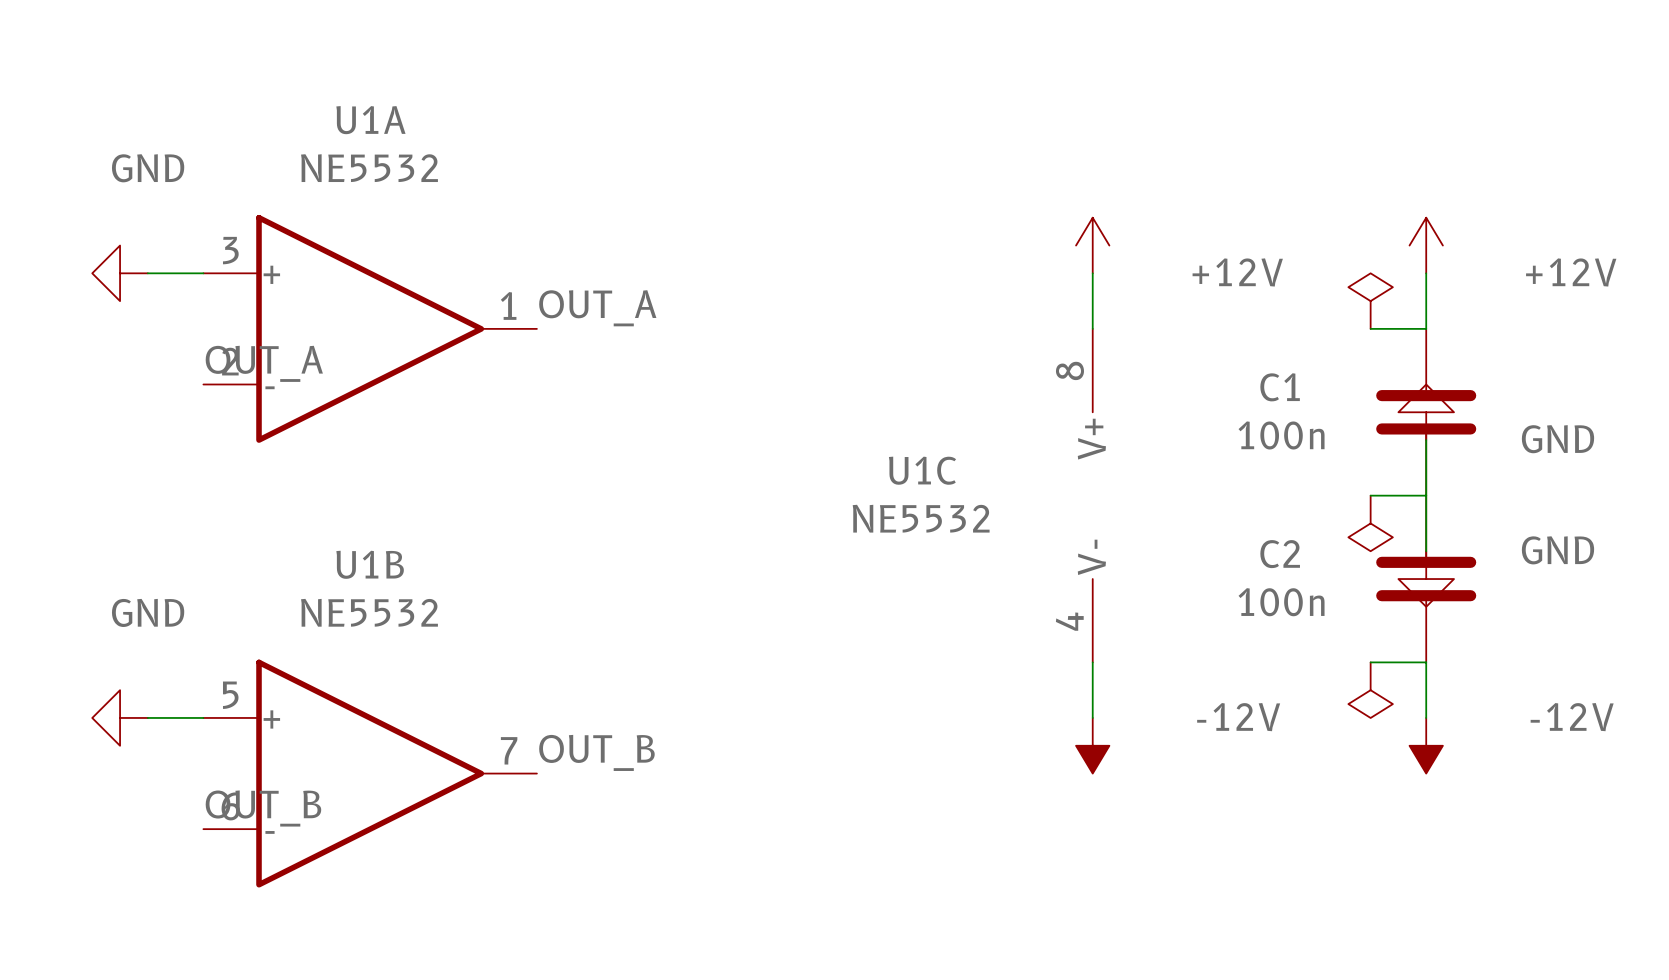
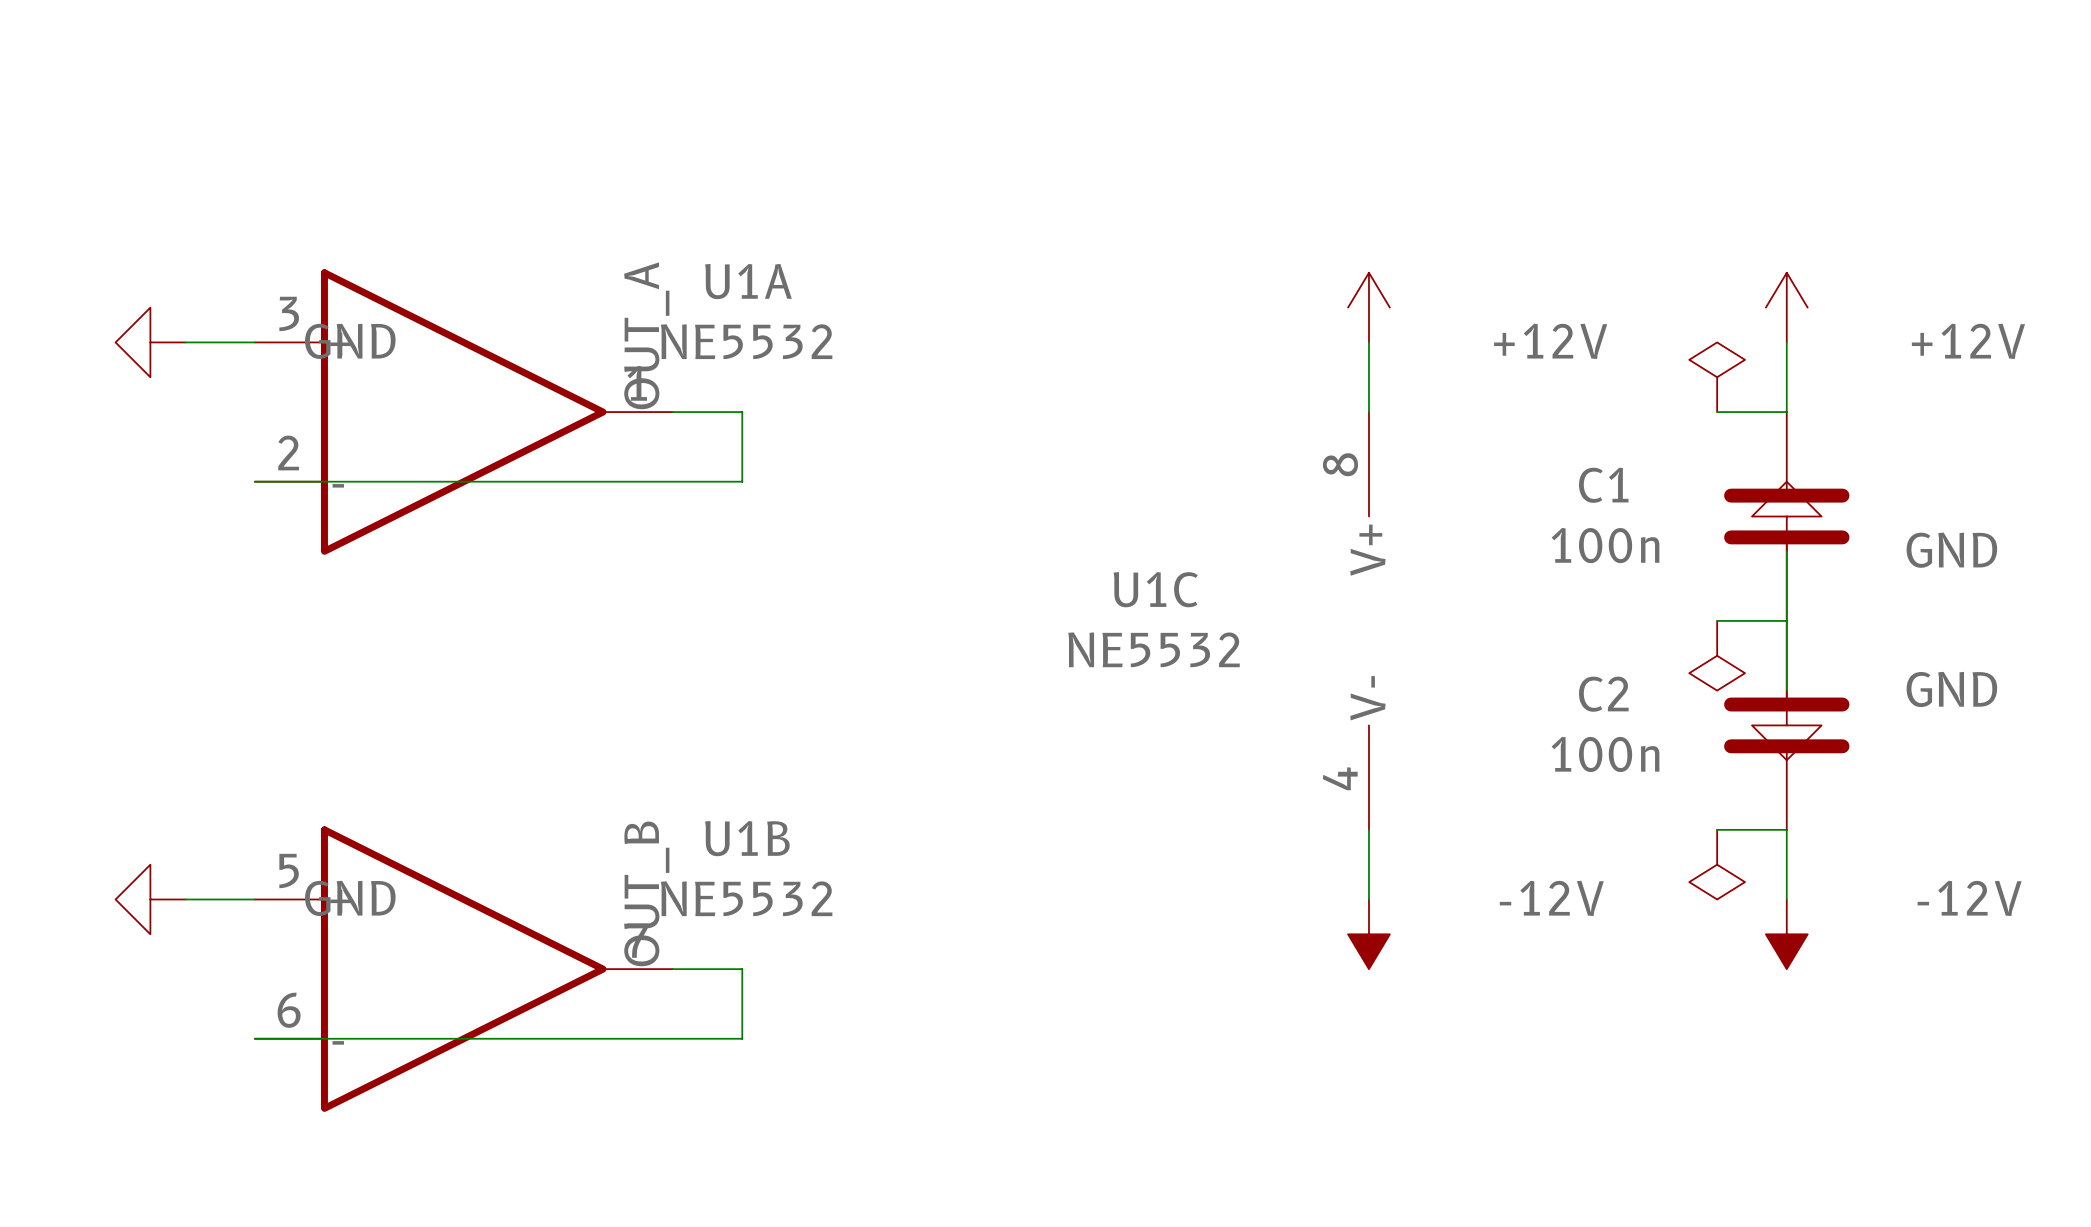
U1A name position: U1A (370, 120) -> U1A (748, 281)
power symbol text position: GND (148, 168) -> GND (350, 341)
U1A value position: NE5532 (369, 168) -> NE5532 (746, 341)
label rotation: 0° (597, 308) -> 90° counterclockwise (646, 335)
wire: none -> (672, 412) (742, 412) (742, 481) (254, 481)
label: OUT_A (264, 363) -> none
U1B name position: U1B (370, 564) -> U1B (747, 838)
power symbol text position: GND (148, 612) -> GND (350, 898)
U1B value position: NE5532 (369, 612) -> NE5532 (746, 898)
label rotation: 0° (596, 752) -> 90° counterclockwise (646, 893)
wire: none -> (672, 969) (742, 969) (742, 1038) (254, 1038)
label: OUT_B (263, 808) -> none

